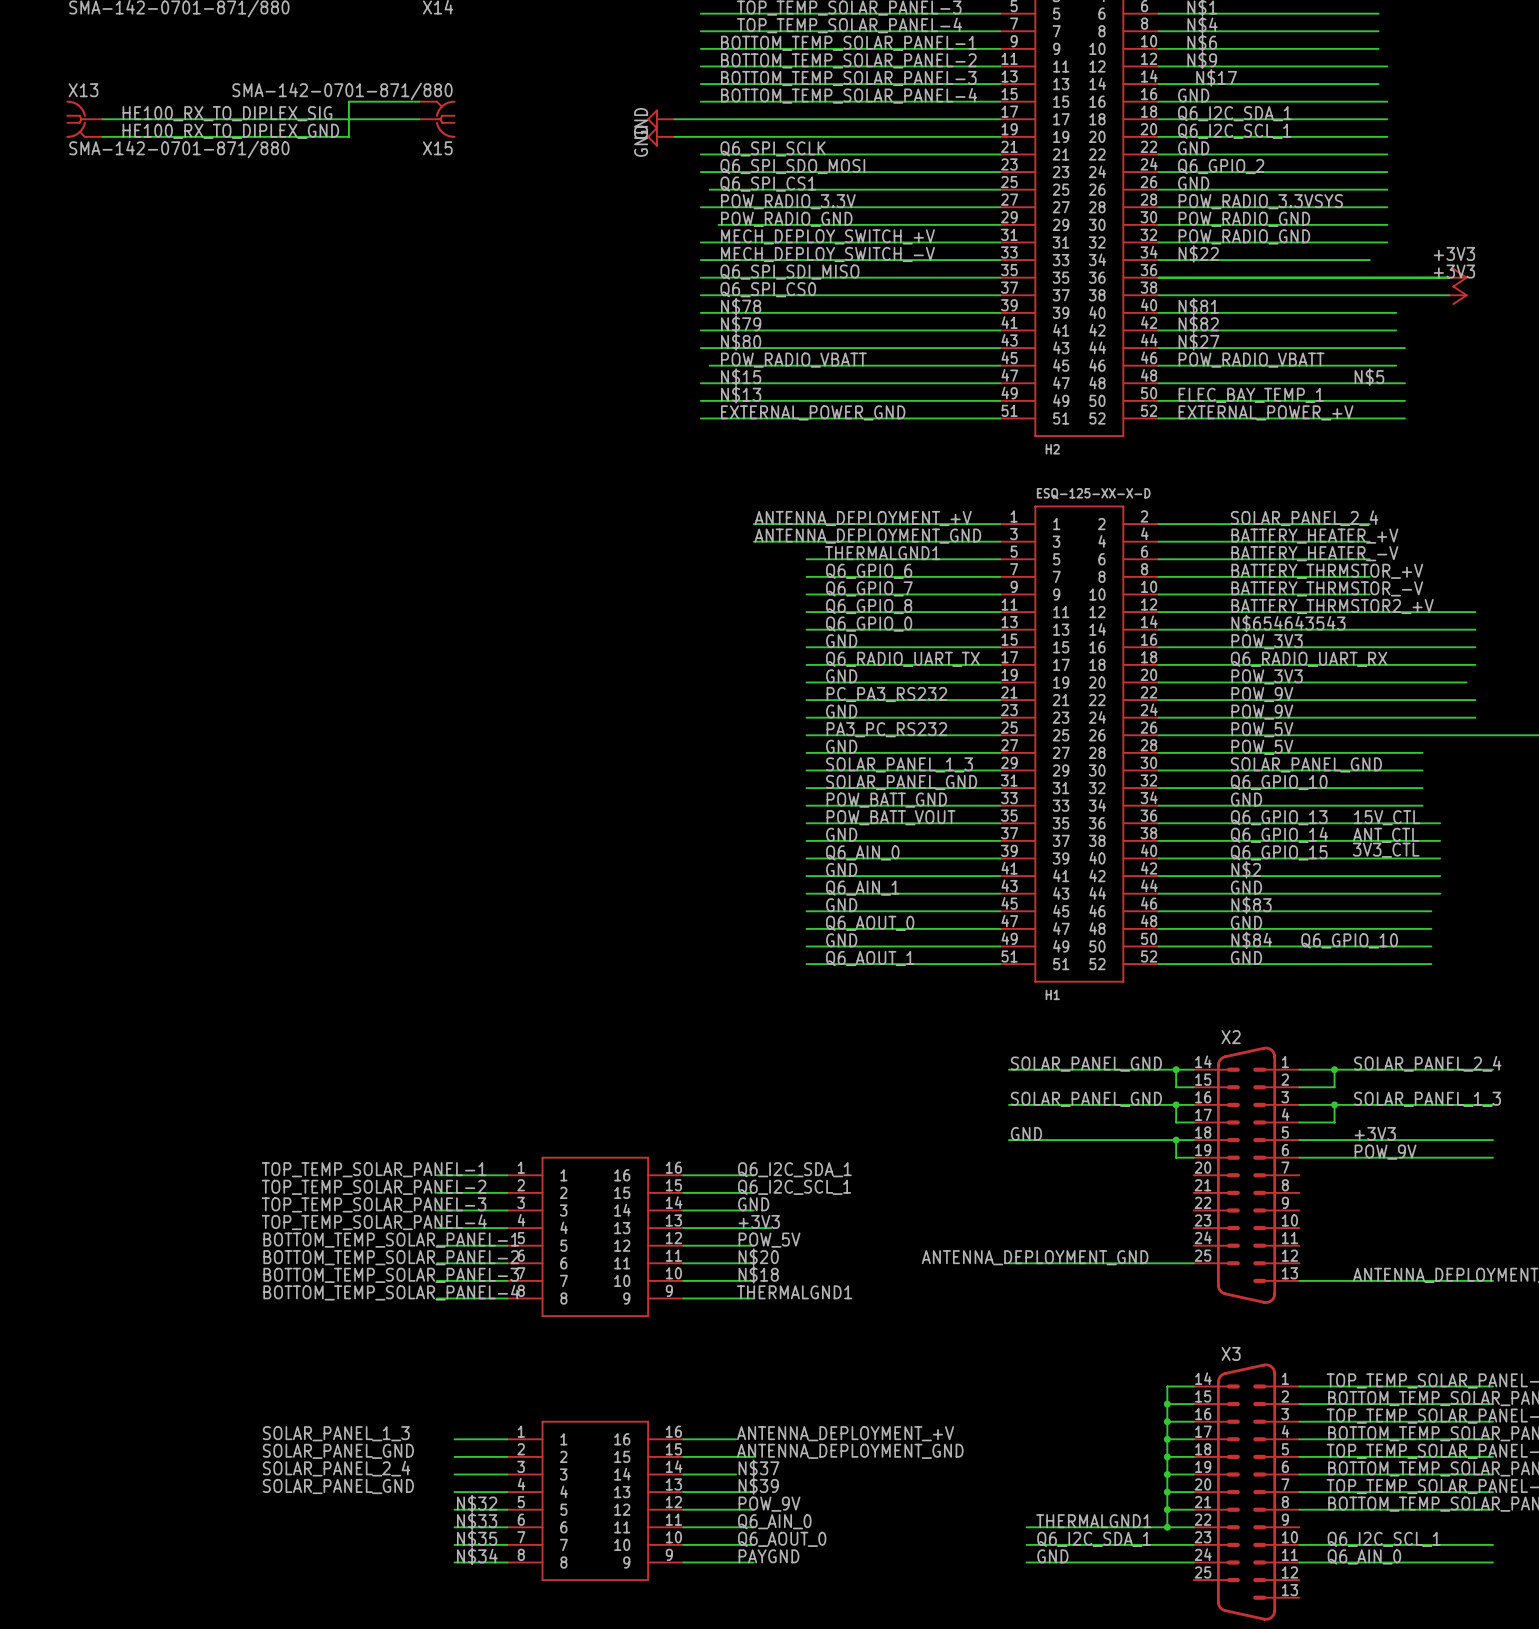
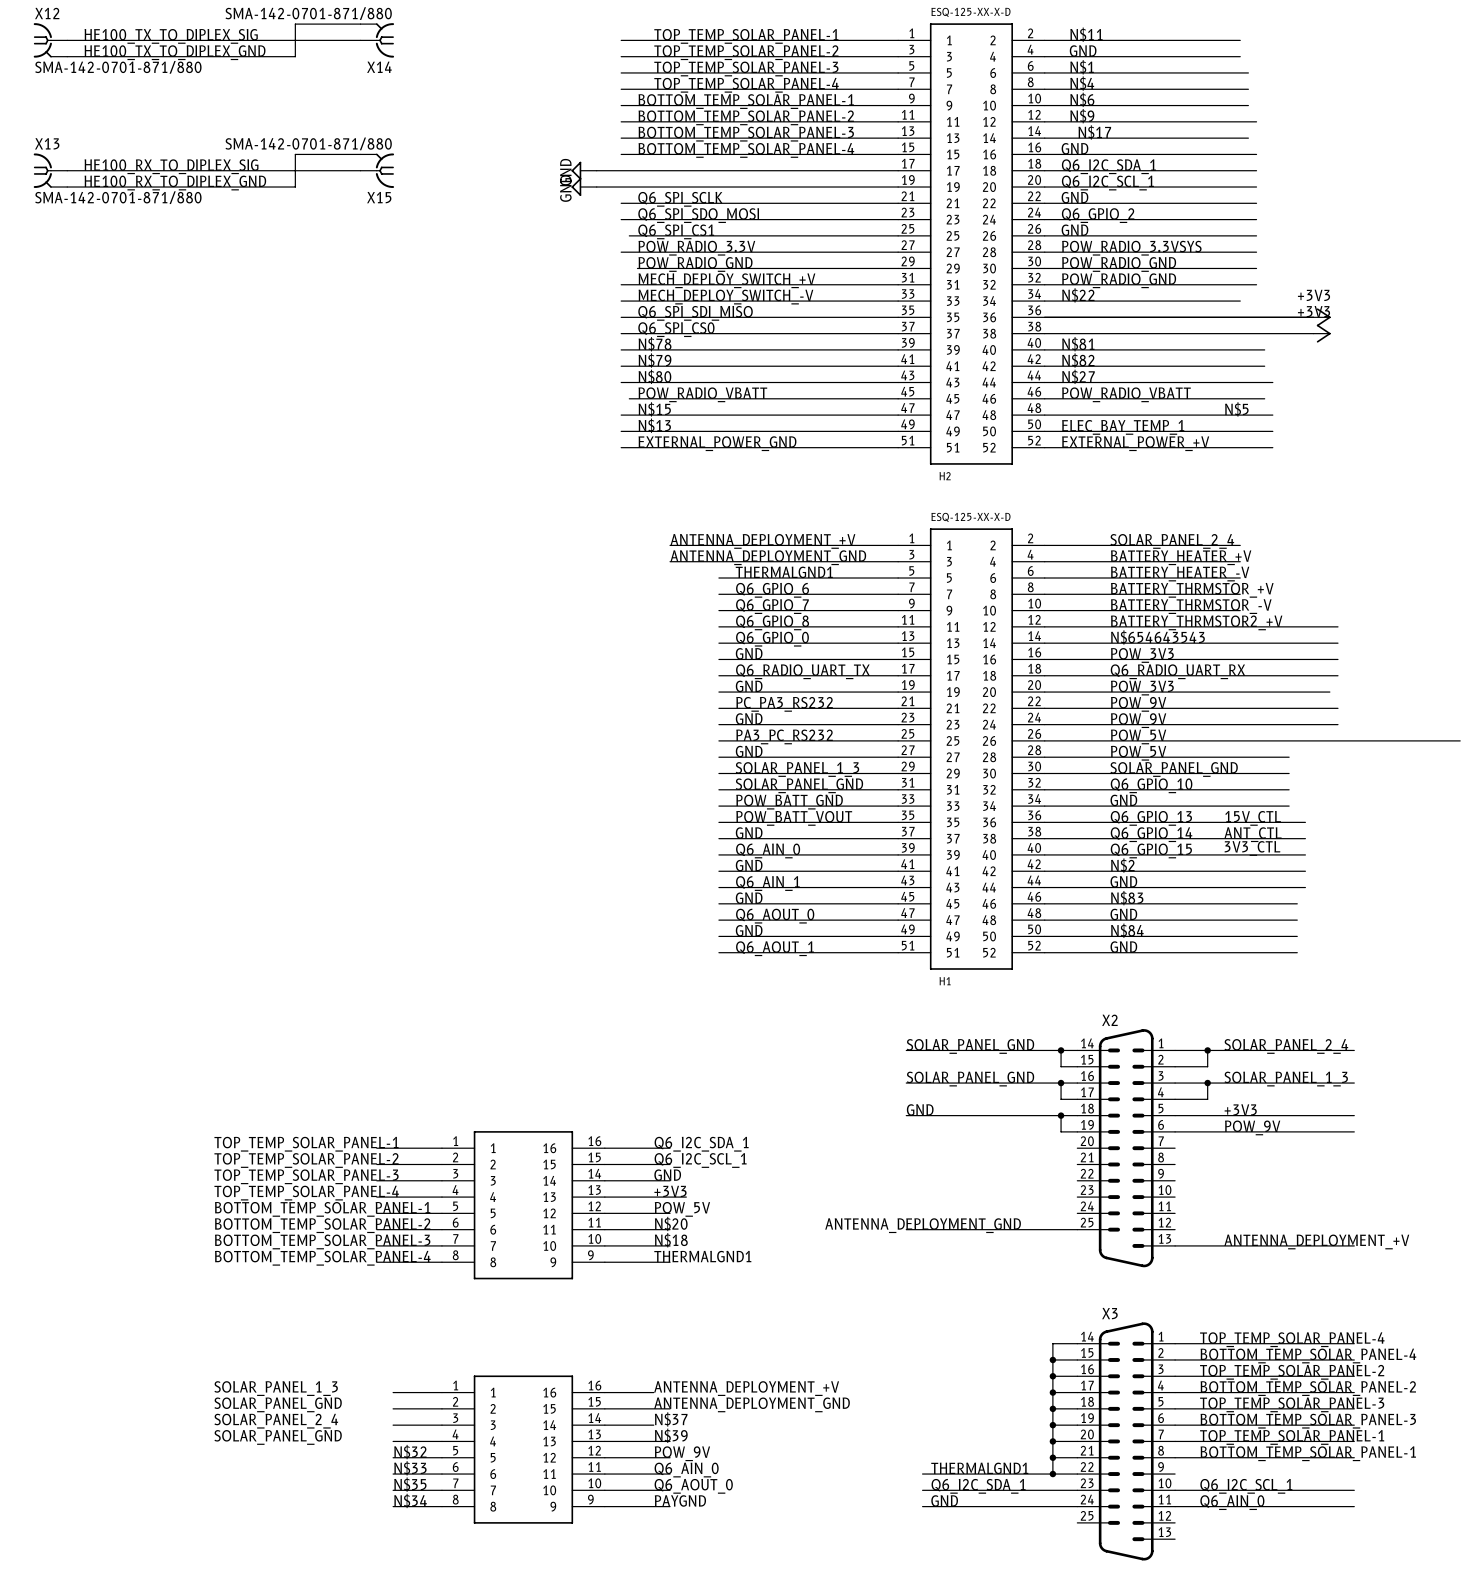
text: Q6_GPIO_10 (1349, 940) -> none

